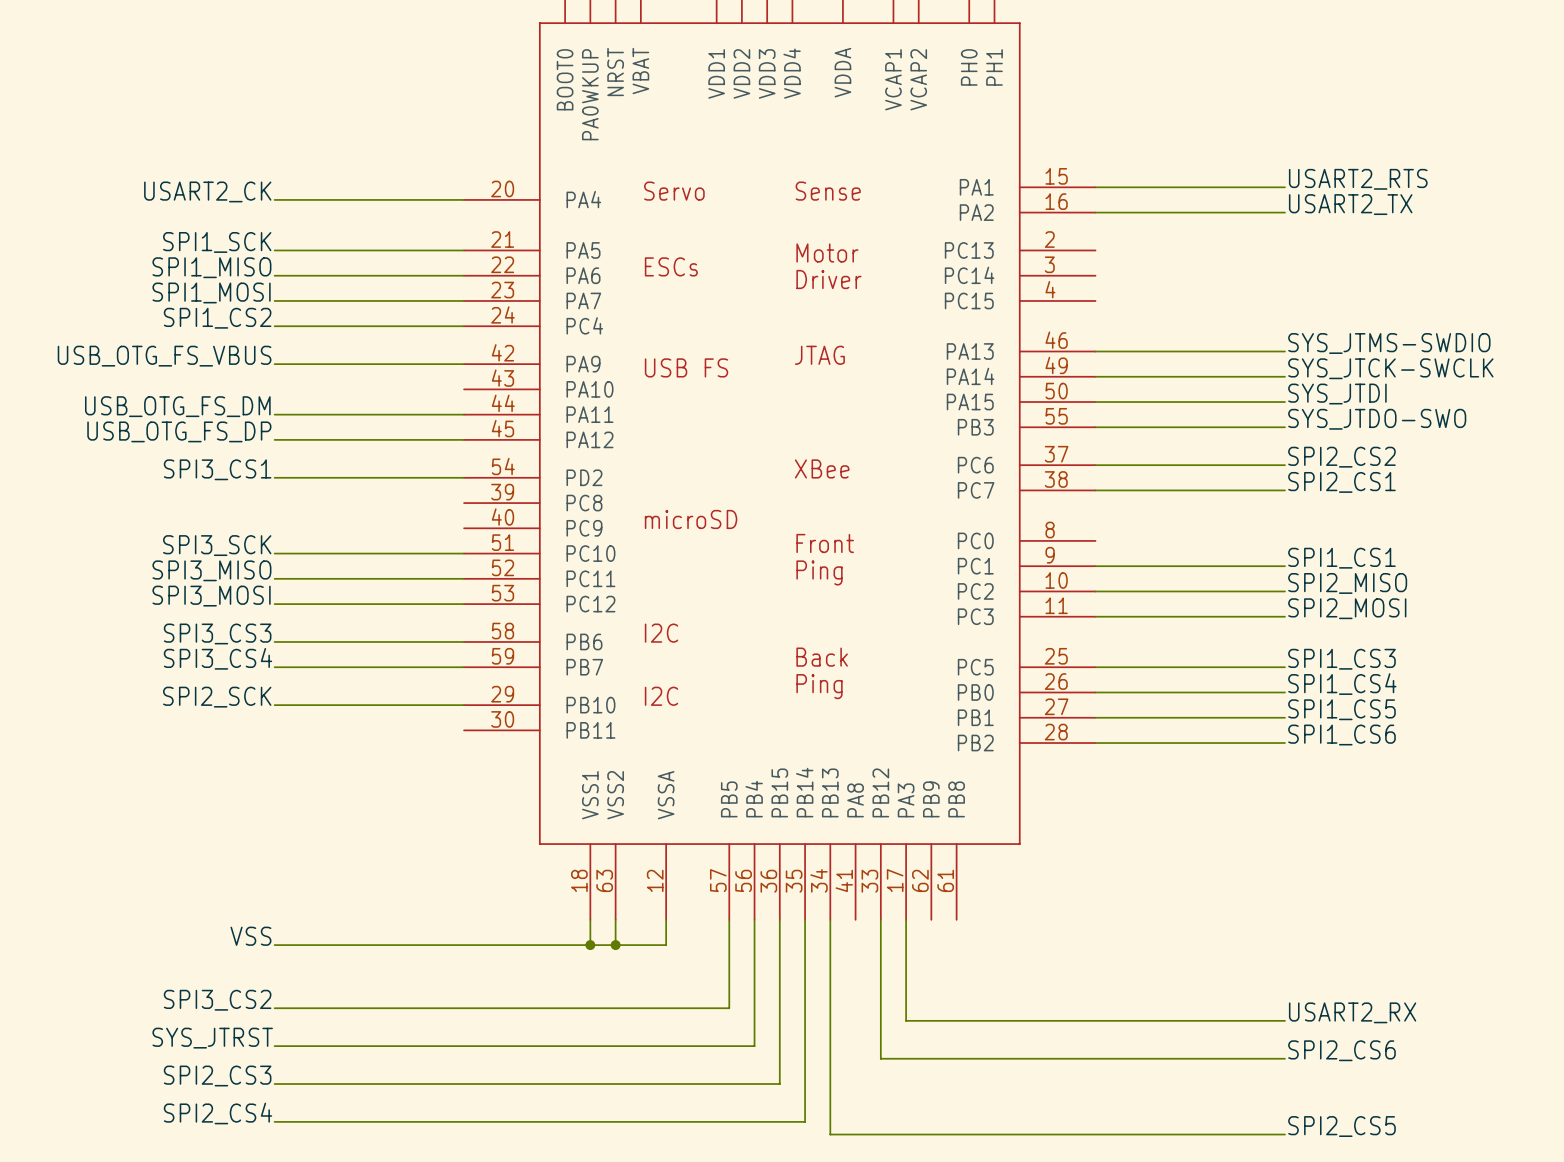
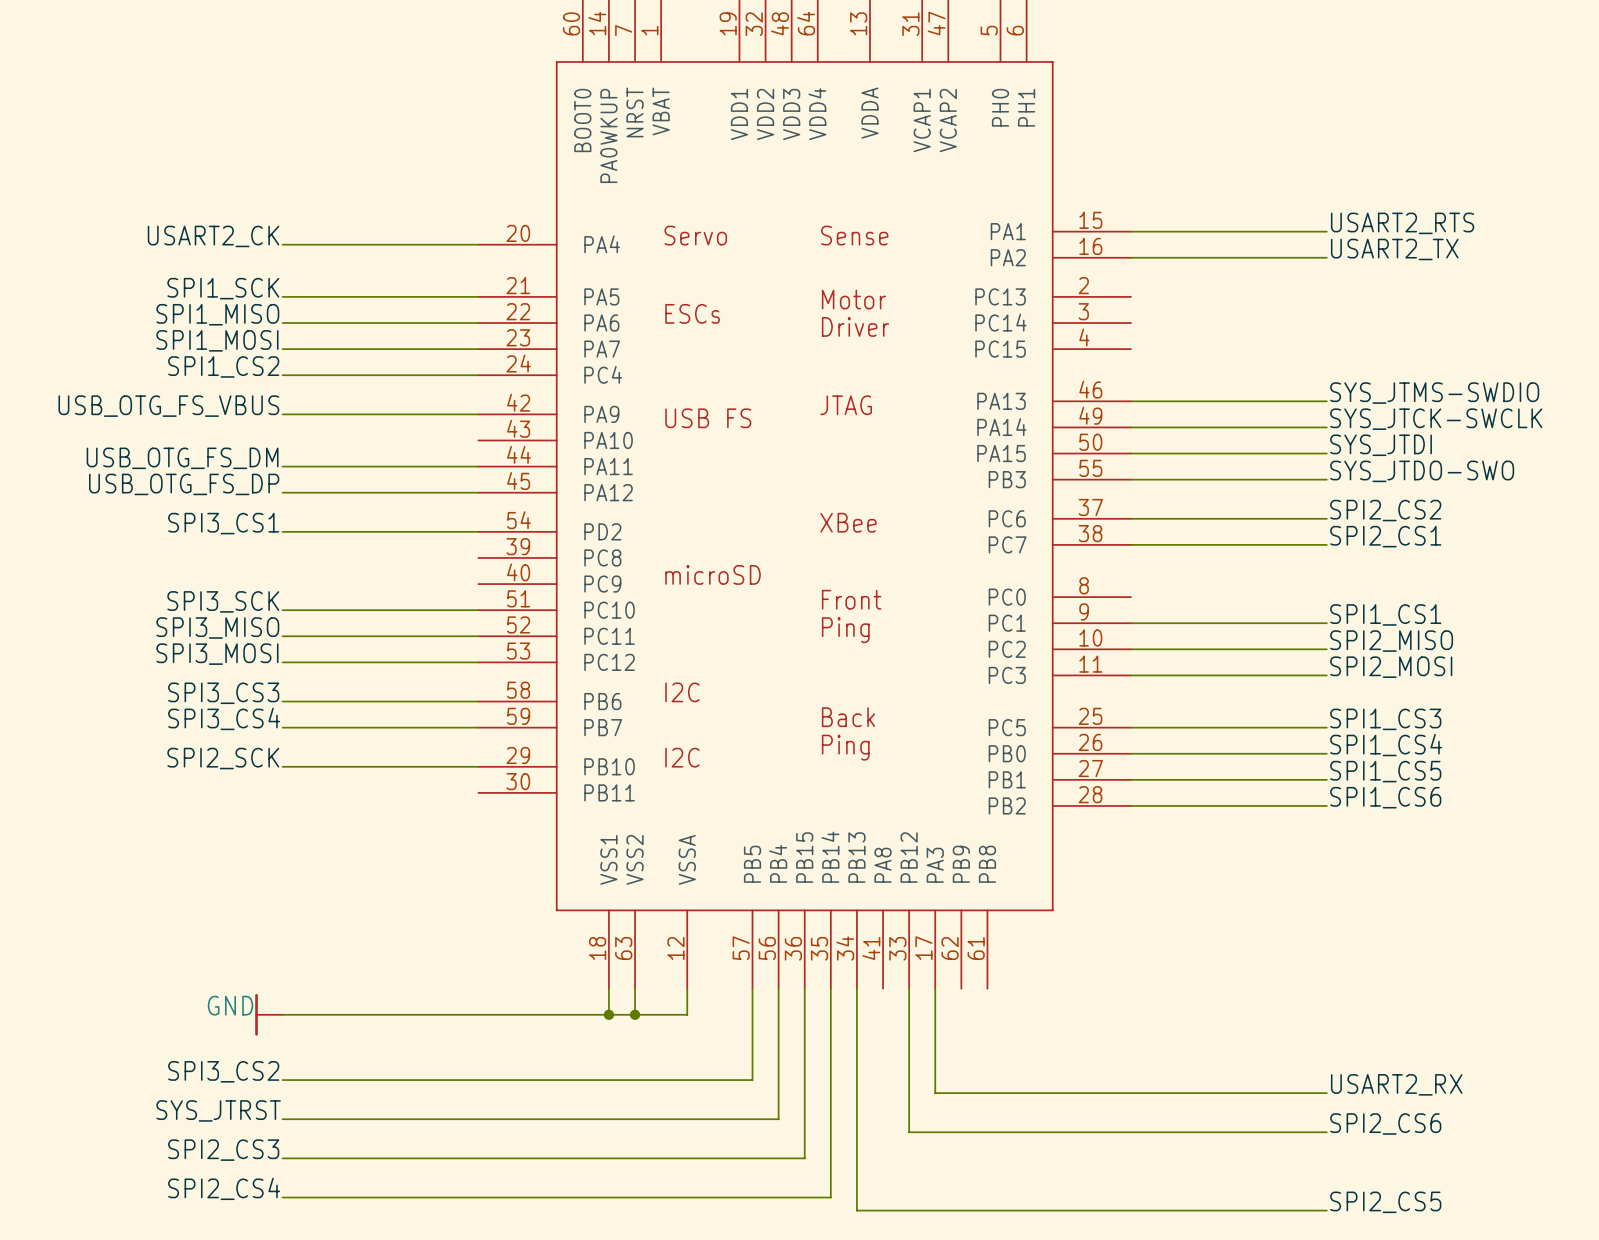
label: VSS (250, 936) -> none
power symbol: none -> GND (268, 1014)

